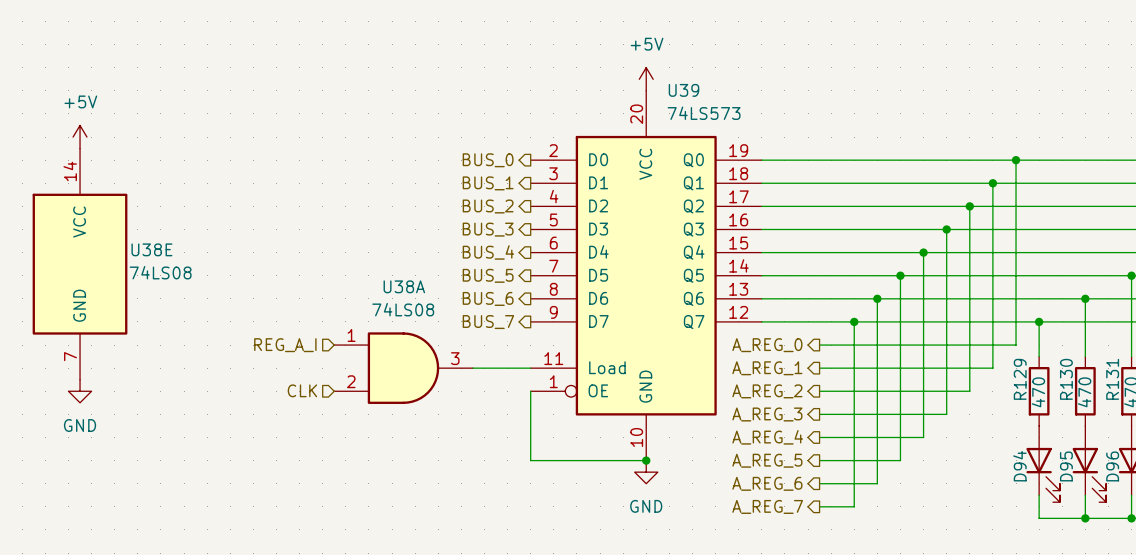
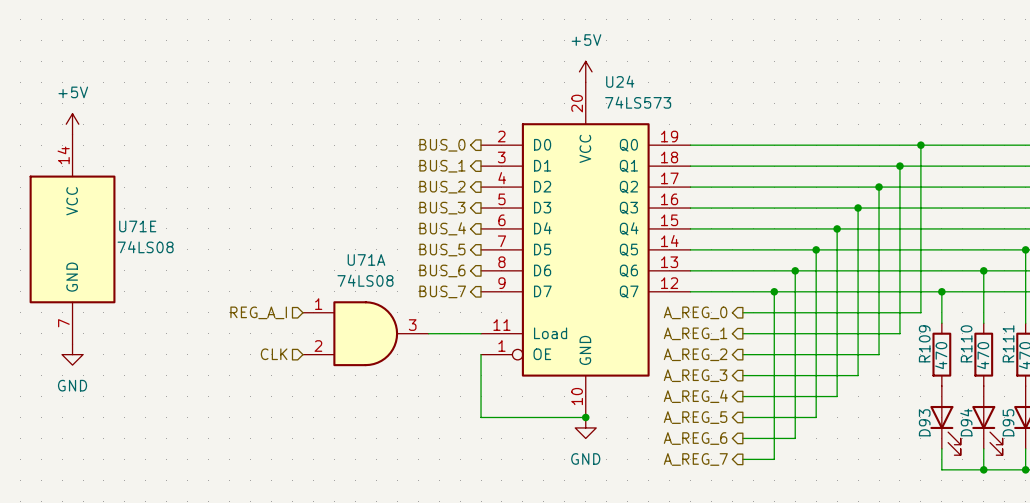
U39 name: U39 (683, 90) -> U24 (620, 81)
U38E name: U38E (151, 249) -> U71E (137, 226)
U38A name: U38A (404, 286) -> U71A (366, 259)
R129 name: R129 (1020, 379) -> R109 (924, 343)
R130 name: R130 (1066, 379) -> R110 (966, 343)
R131 name: R131 (1112, 379) -> R111 (1008, 343)
D94 name: D94 (1019, 466) -> D93 (924, 422)
D95 name: D95 (1066, 466) -> D94 (966, 422)
D96 name: D96 (1112, 466) -> D95 (1008, 422)

